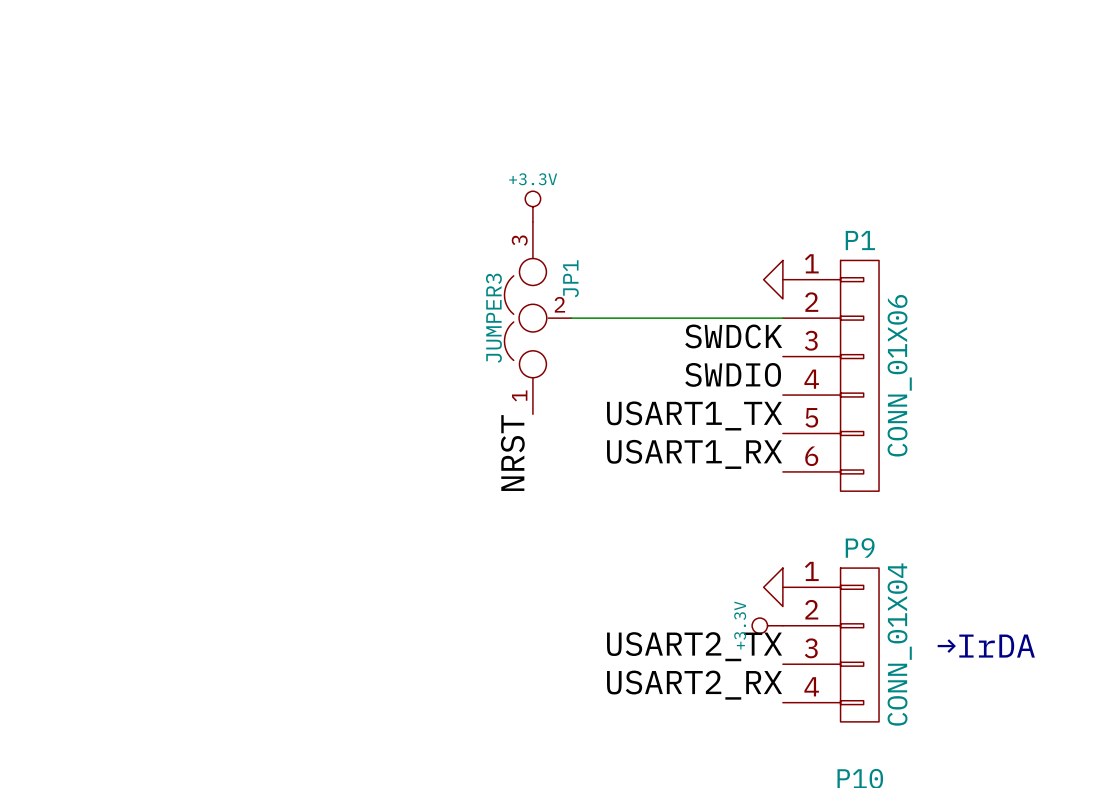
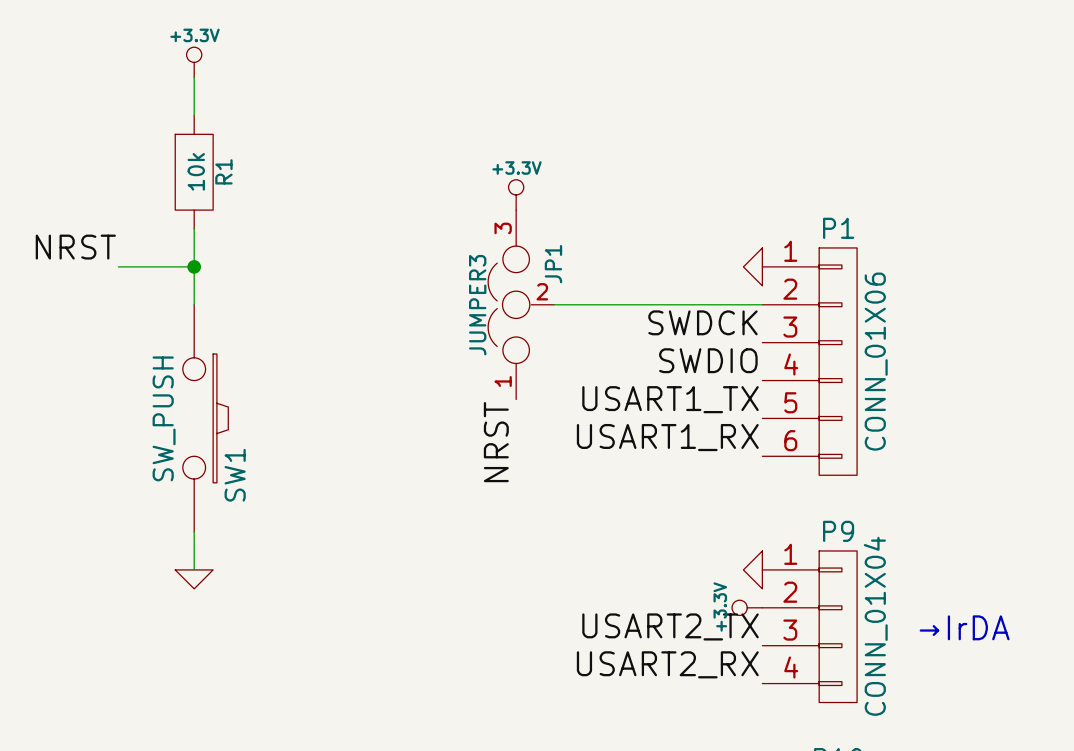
power symbol: none -> +3.3V (194, 62)
wire: none -> (194, 77) (194, 115)
R1: none -> 10k (194, 172)
wire: none -> (194, 229) (194, 304)
label: none -> NRST (75, 247)
wire: none -> (118, 266) (194, 266)
junction: none -> (194, 266)
SW1: none -> SW_PUSH (205, 418)
wire: none -> (194, 532) (194, 569)
power symbol: none -> (194, 579)

